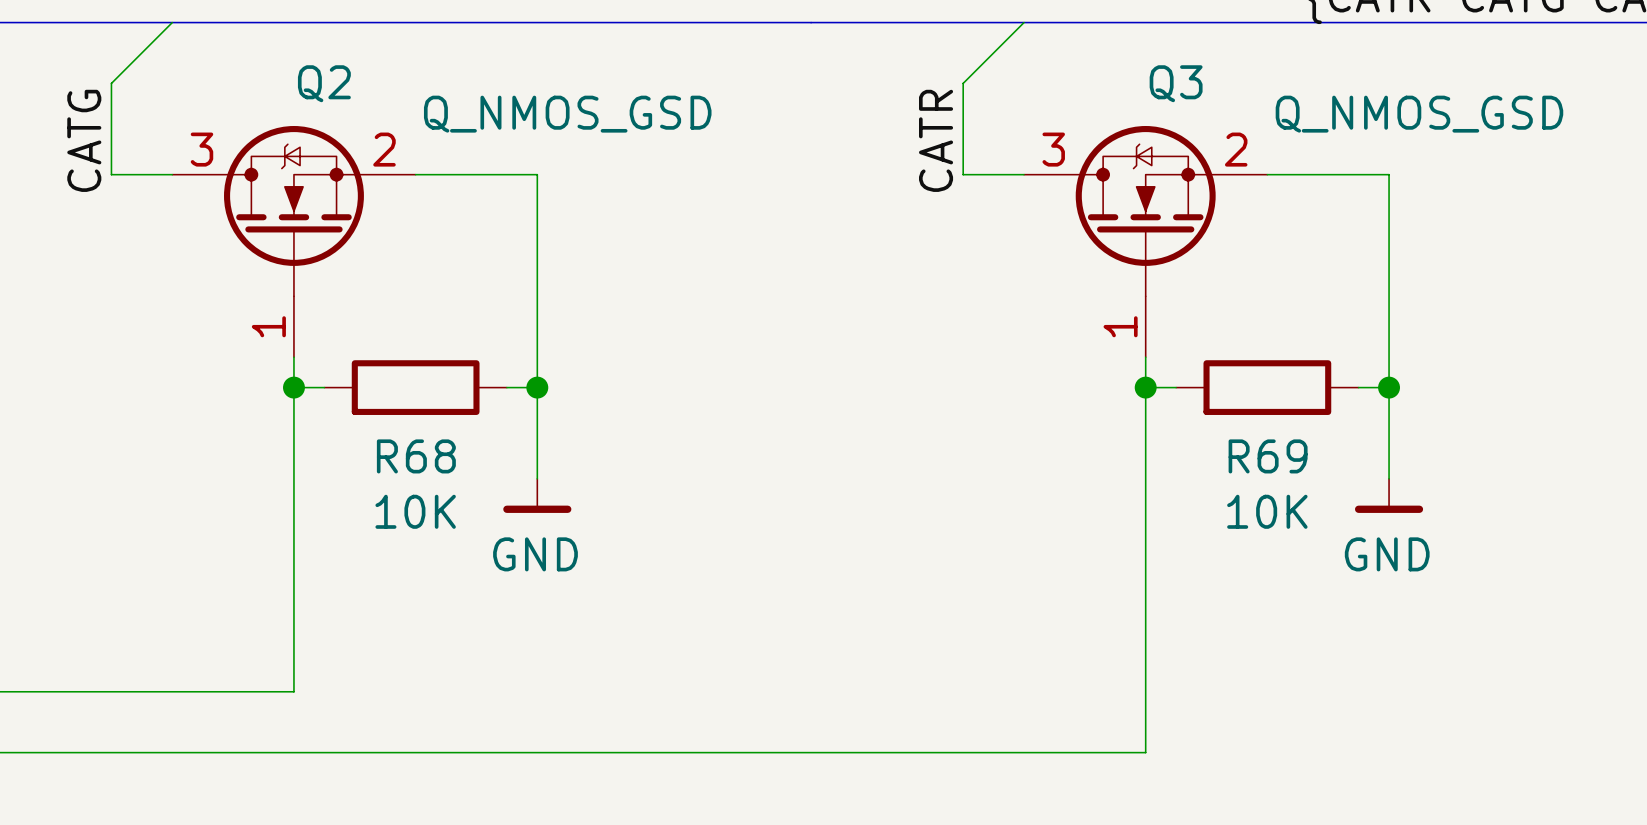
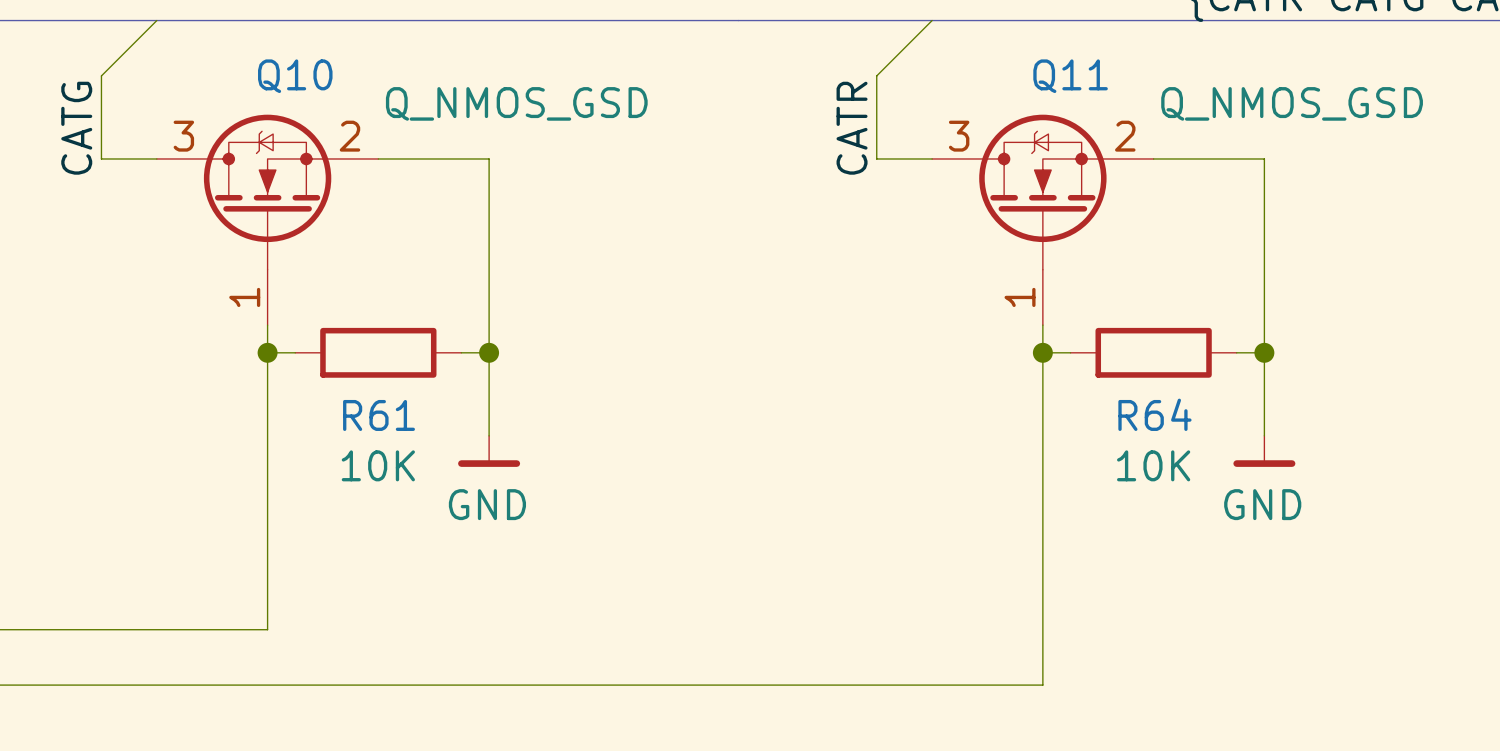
Q2 name: Q2 (324, 83) -> Q10 (295, 76)
Q3 name: Q3 (1176, 83) -> Q11 (1070, 76)
R68 name: R68 (416, 456) -> R61 (379, 415)
R69 name: R69 (1268, 456) -> R64 (1154, 414)

